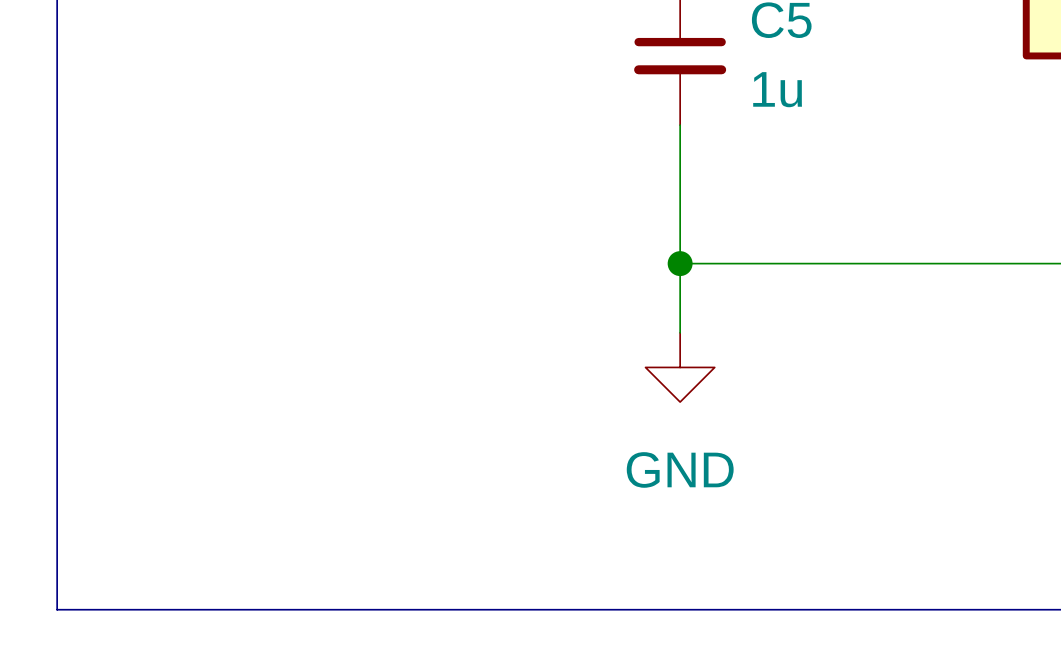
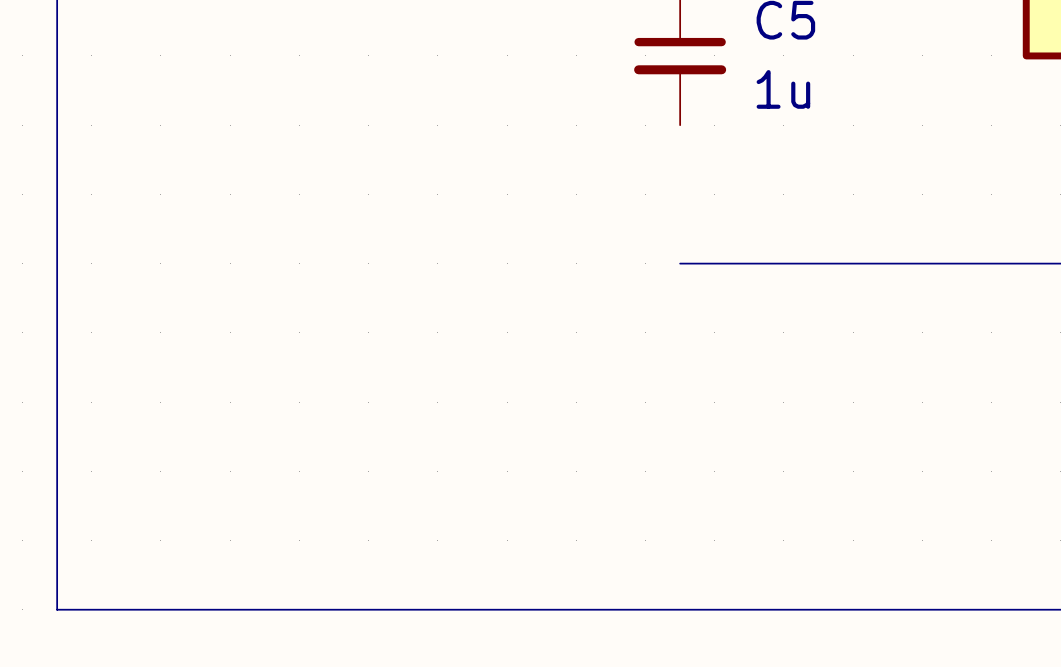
wire: (680, 125) (680, 332) -> none
junction: (680, 263) -> none
power symbol: GND (680, 367) -> none

